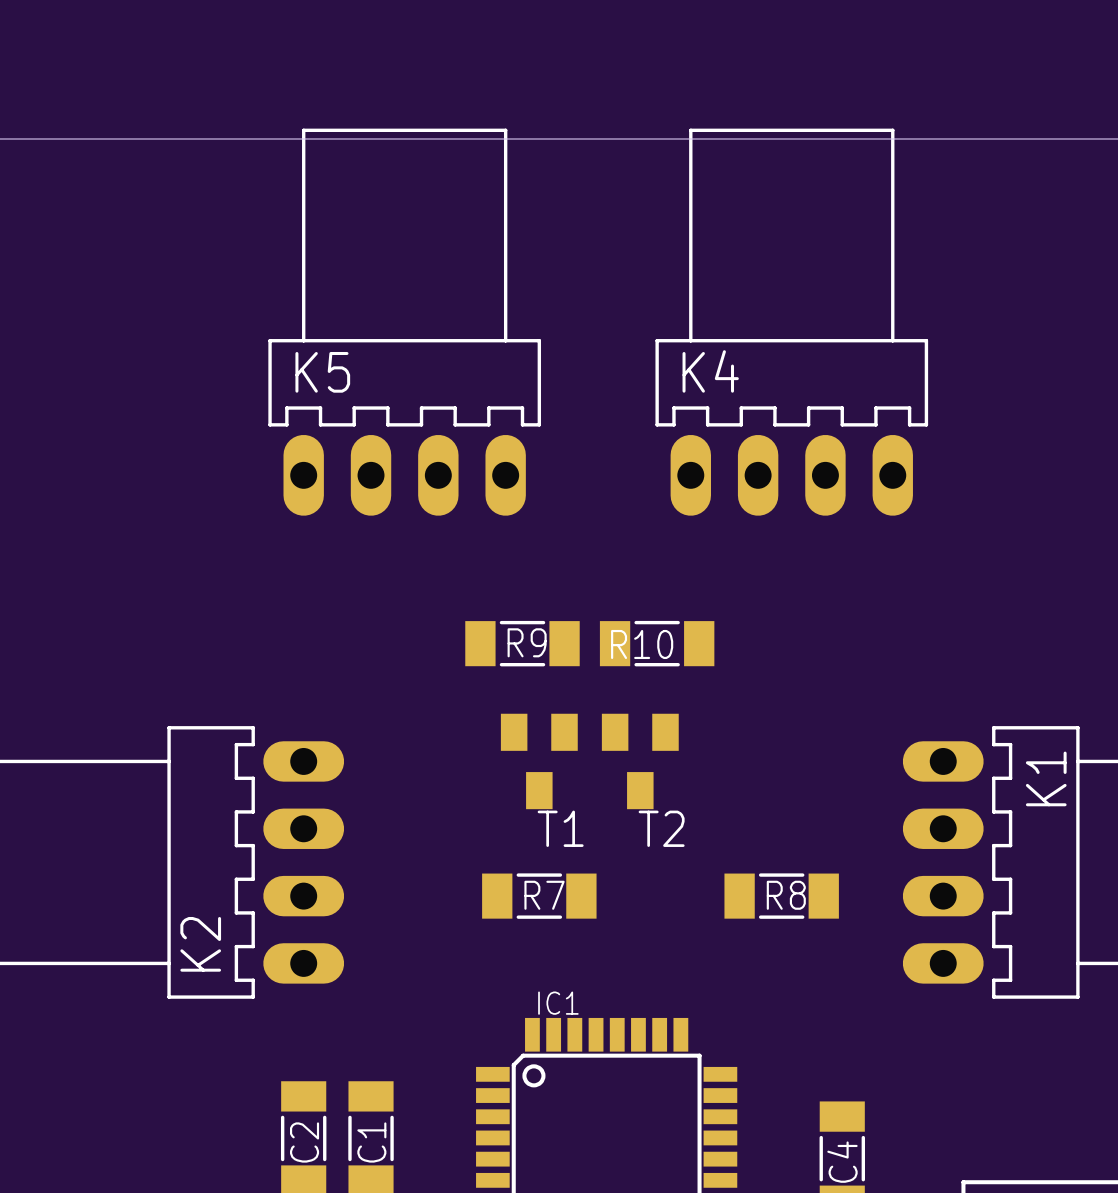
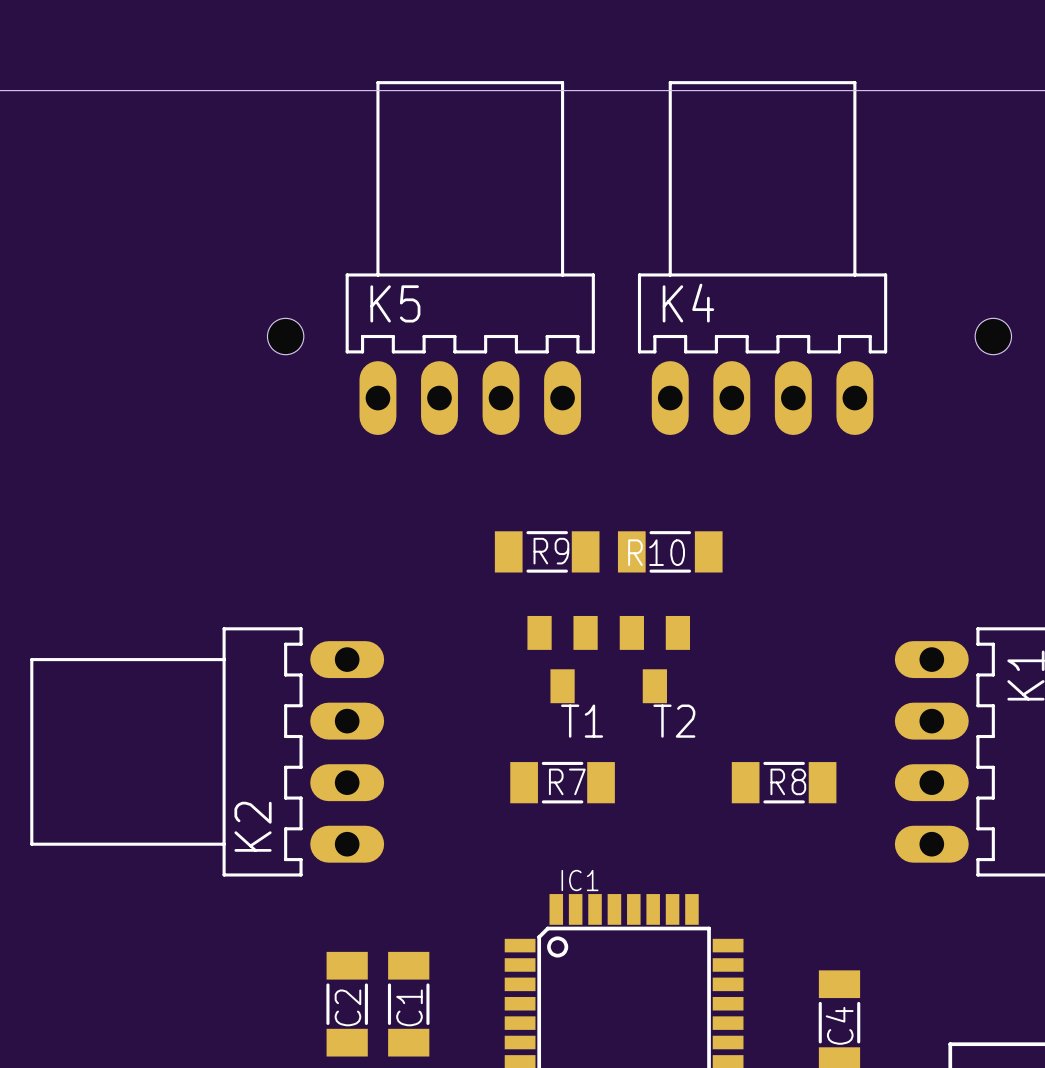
K5 position: (404, 322) -> (470, 258)
K4 position: (791, 322) -> (762, 258)
hole: none -> (285, 336)
hole: none -> (993, 336)

